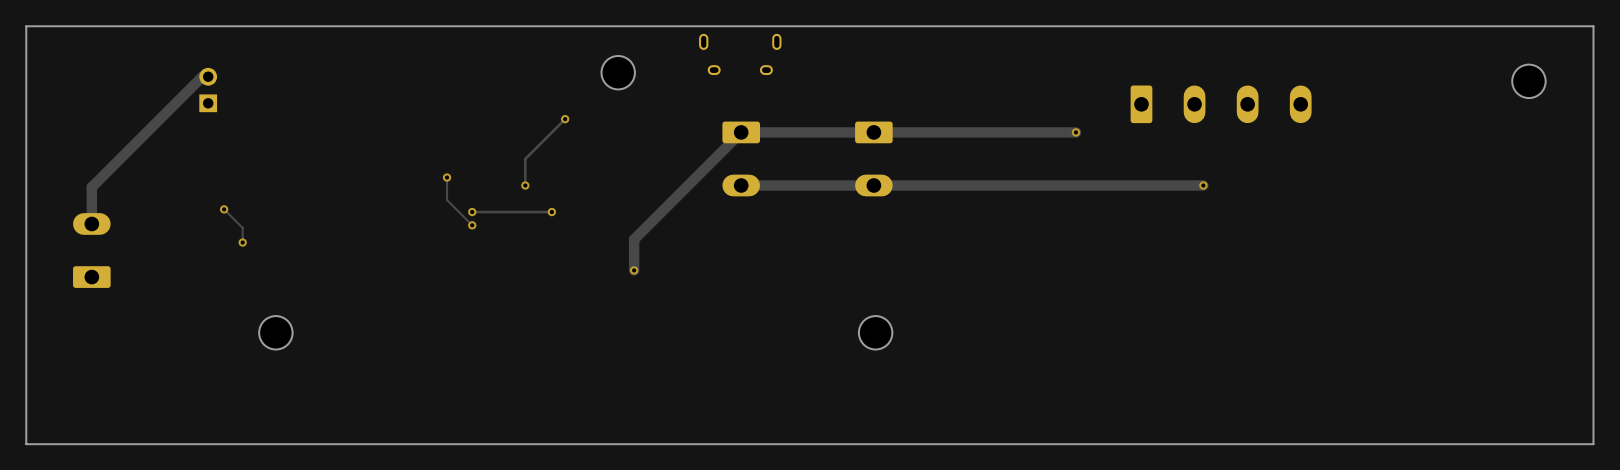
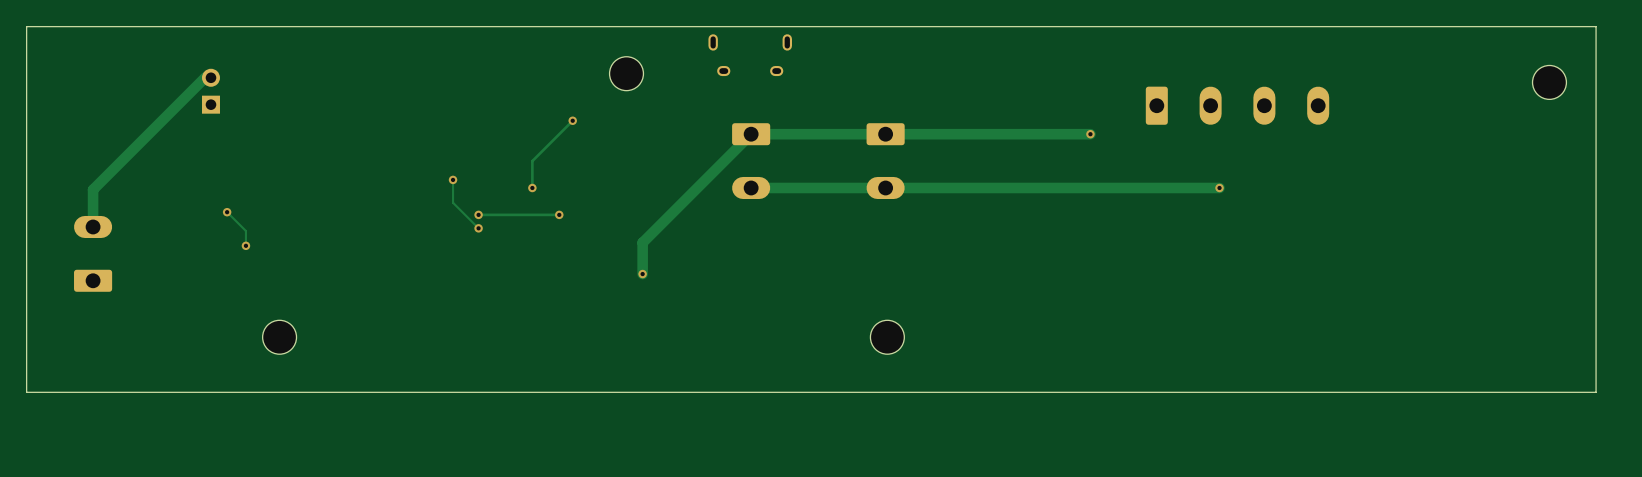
board edge: (1574, 26) (1593, 26) (1593, 444) (26, 444) (26, 387) -> (1596, 26) (1596, 392) (26, 392)

